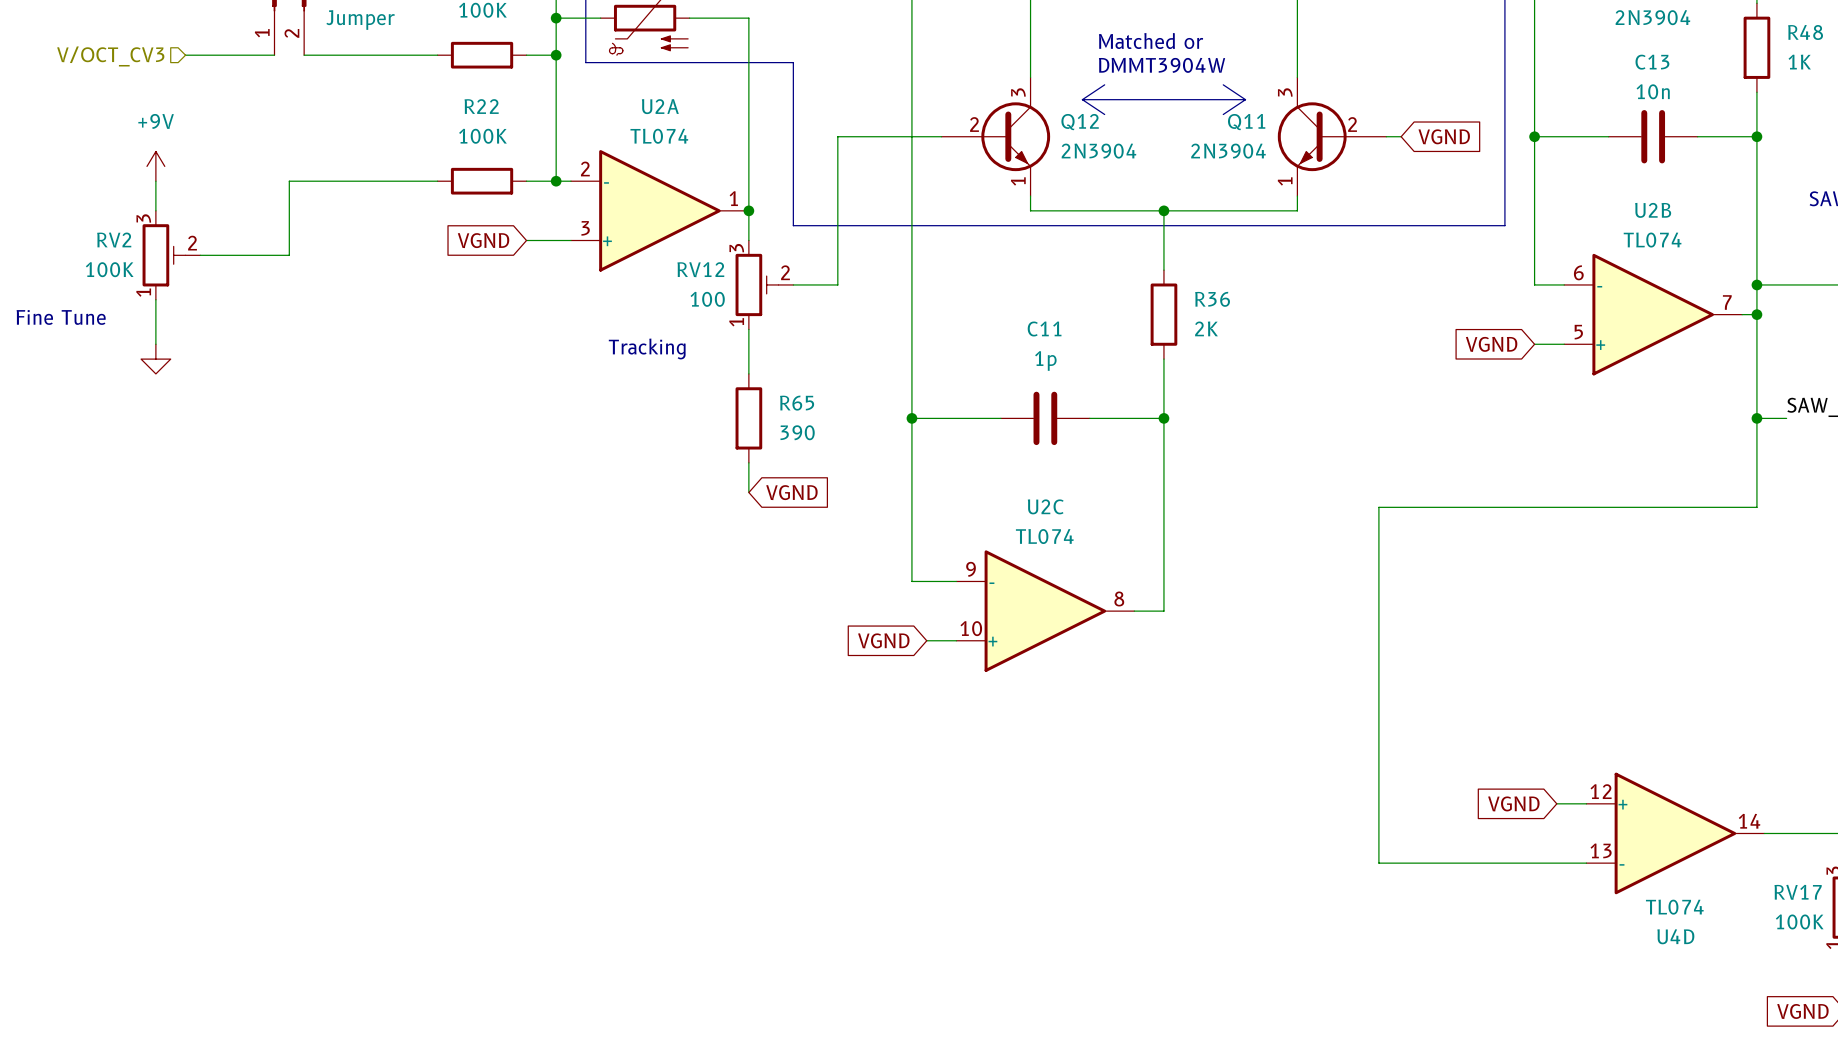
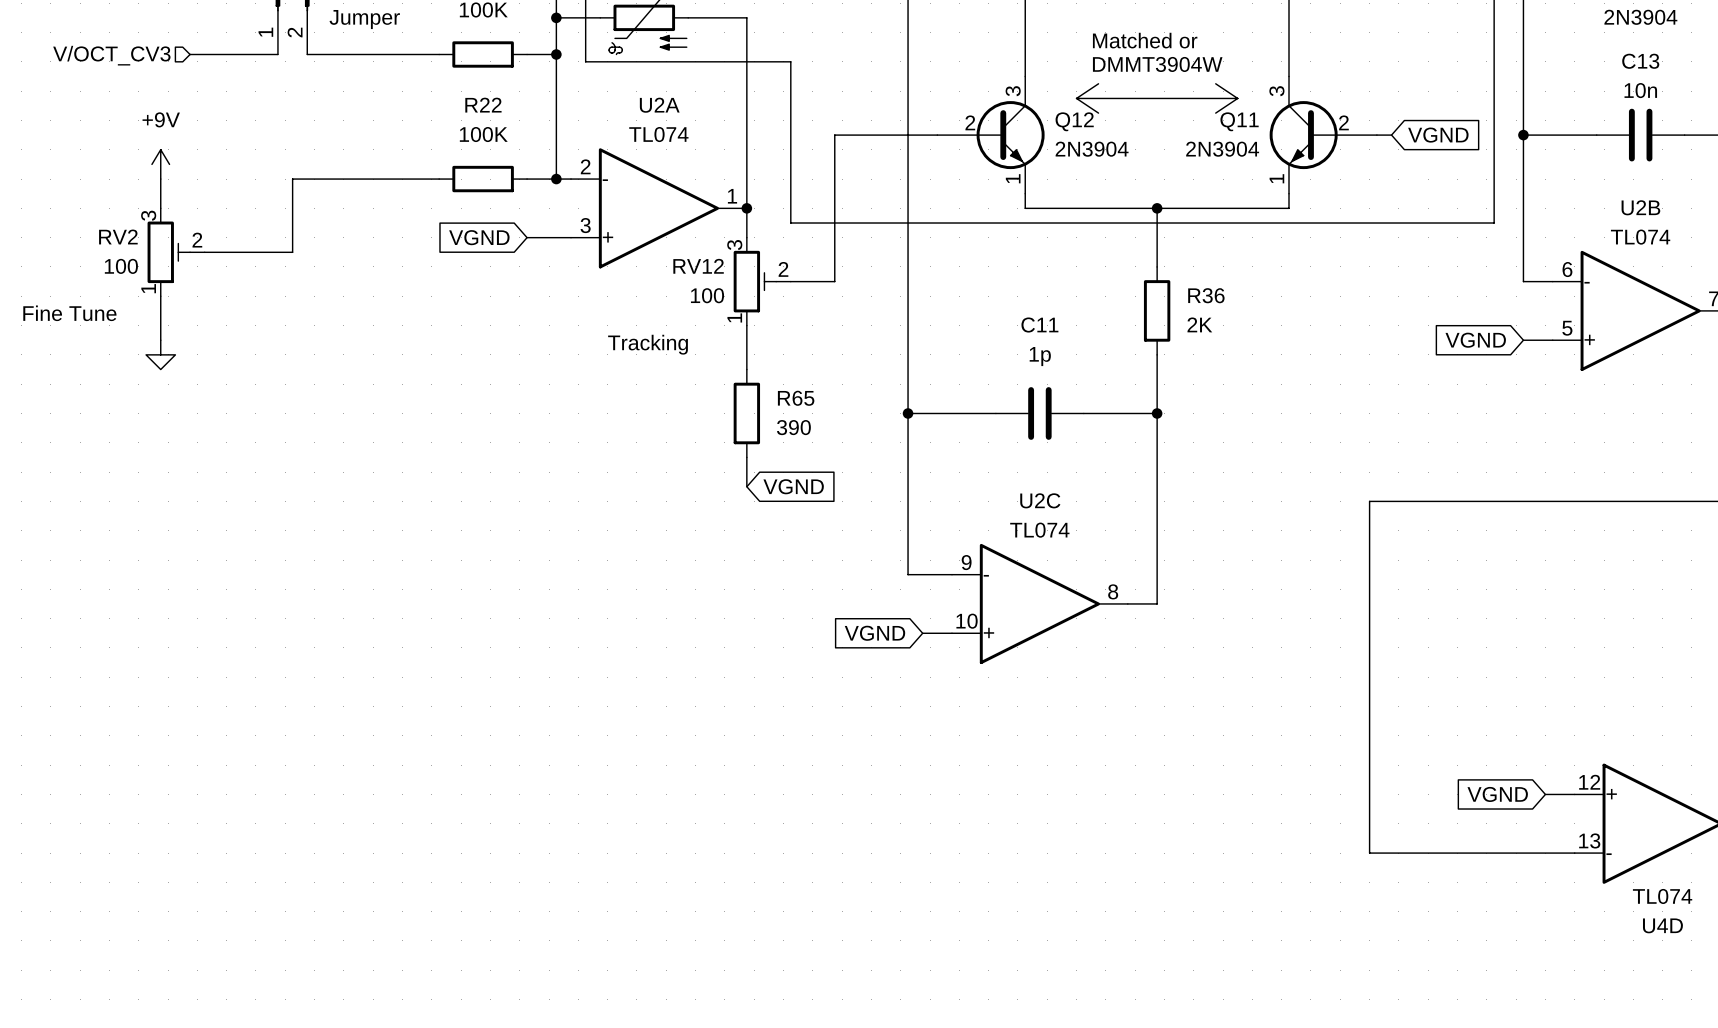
RV2 value: 100K (109, 269) -> 100 (121, 266)

